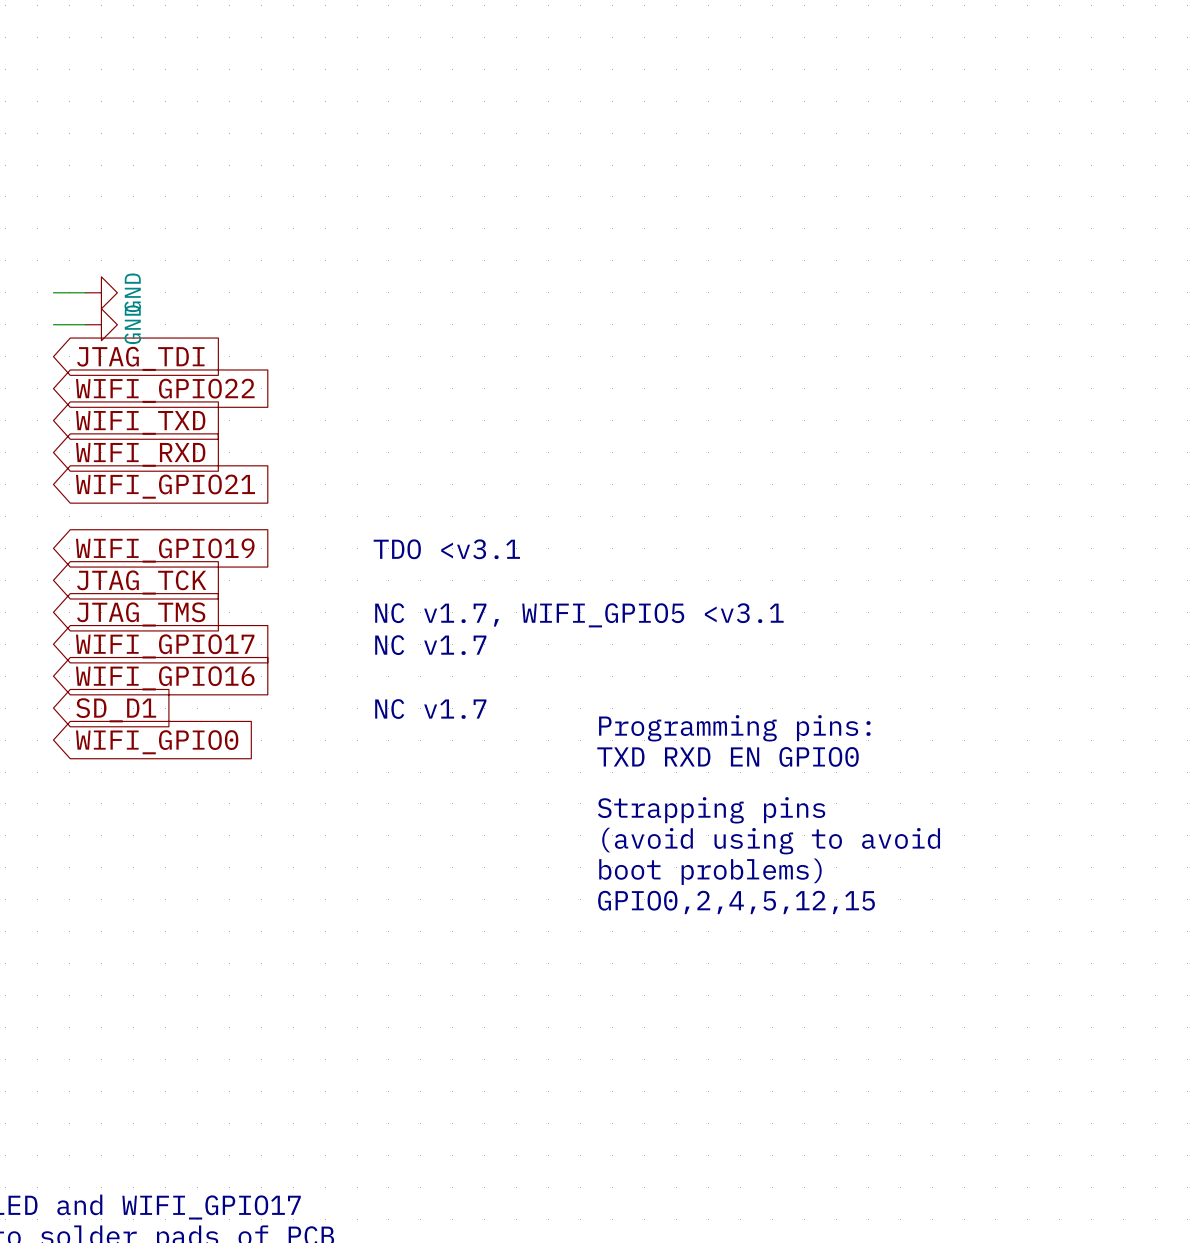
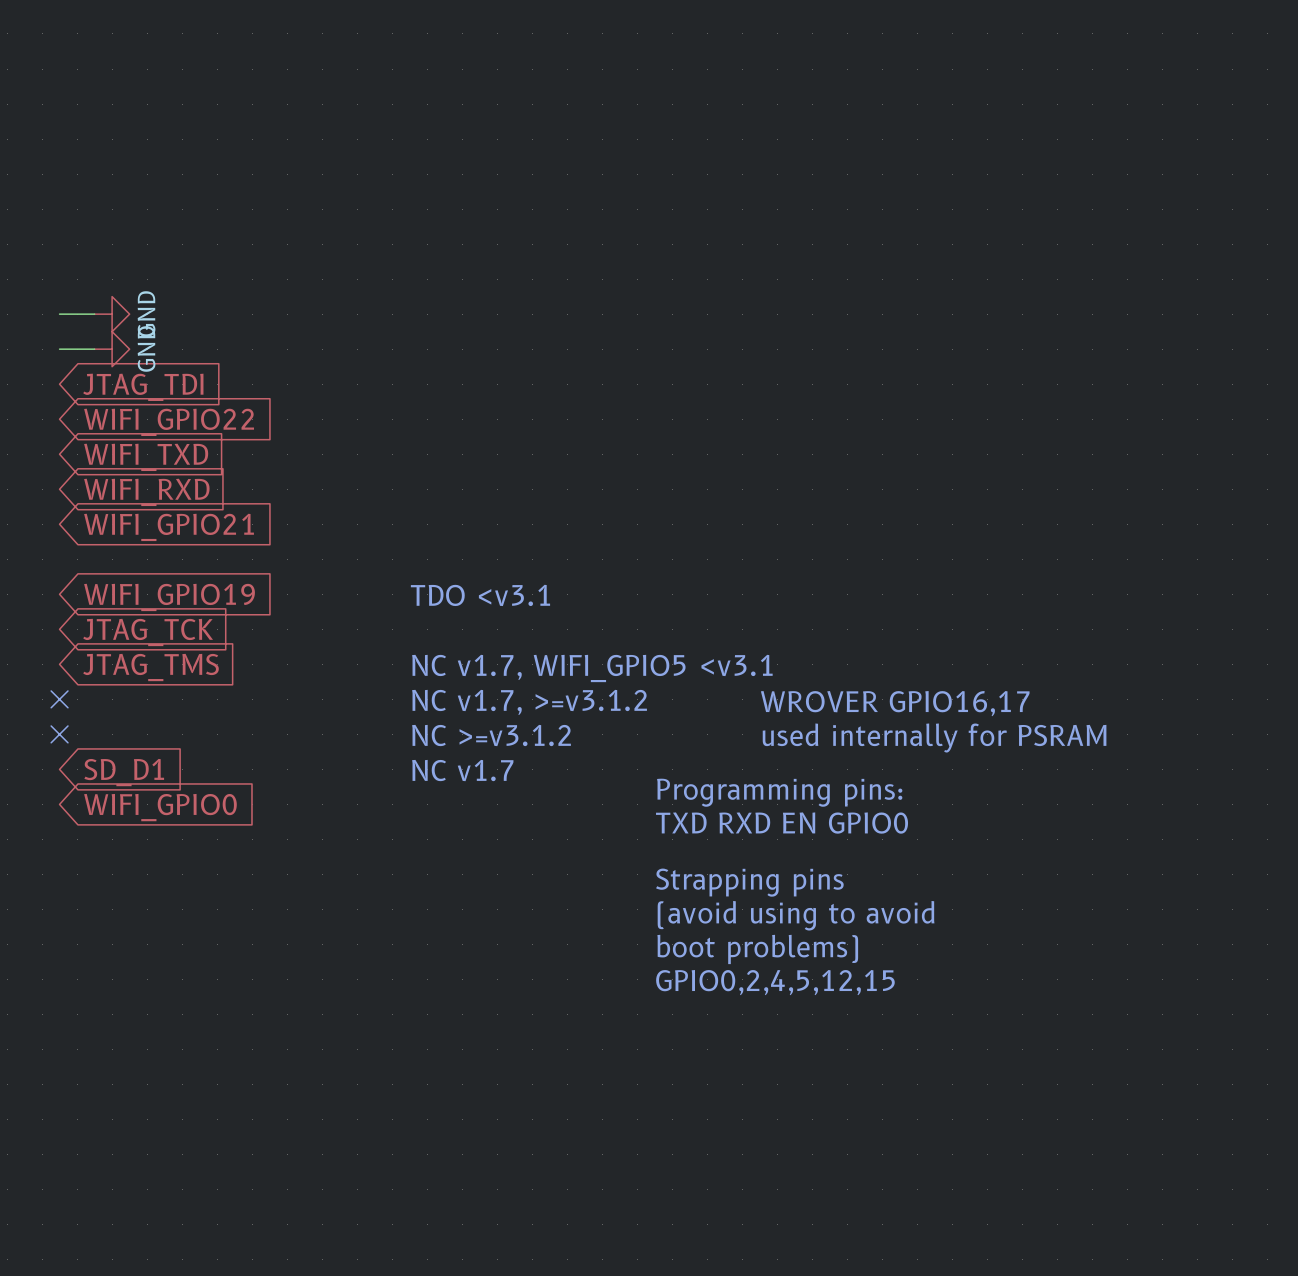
no-connect mark: none -> (59, 699)
text: NC v1.7 (430, 645) -> NC v1.7, >=v3.1.2 (529, 702)
global label: WIFI_GPIO17 (165, 646) -> none
text: none -> WROVER GPIO16,17 (895, 703)
no-connect mark: none -> (59, 734)
text: none -> NC >=v3.1.2 (491, 735)
global label: WIFI_GPIO16 (165, 678) -> none
text: none -> used internally for PSRAM (934, 738)

